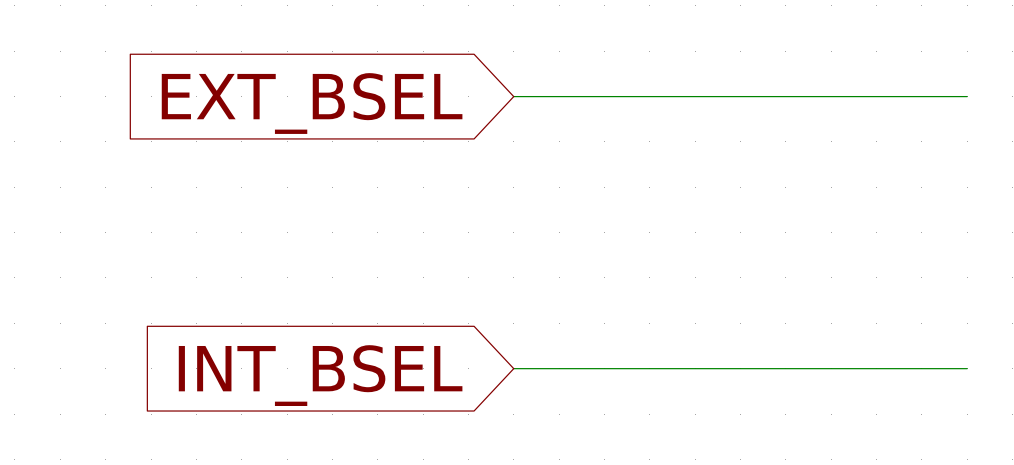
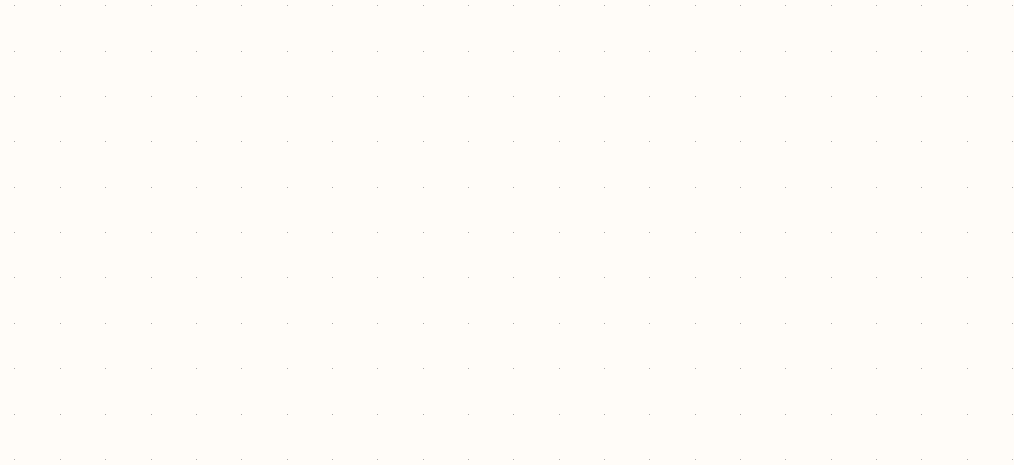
wire: (513, 96) (967, 96) -> none
global label: EXT_BSEL (312, 103) -> none
wire: (513, 368) (967, 368) -> none
global label: INT_BSEL (320, 375) -> none

